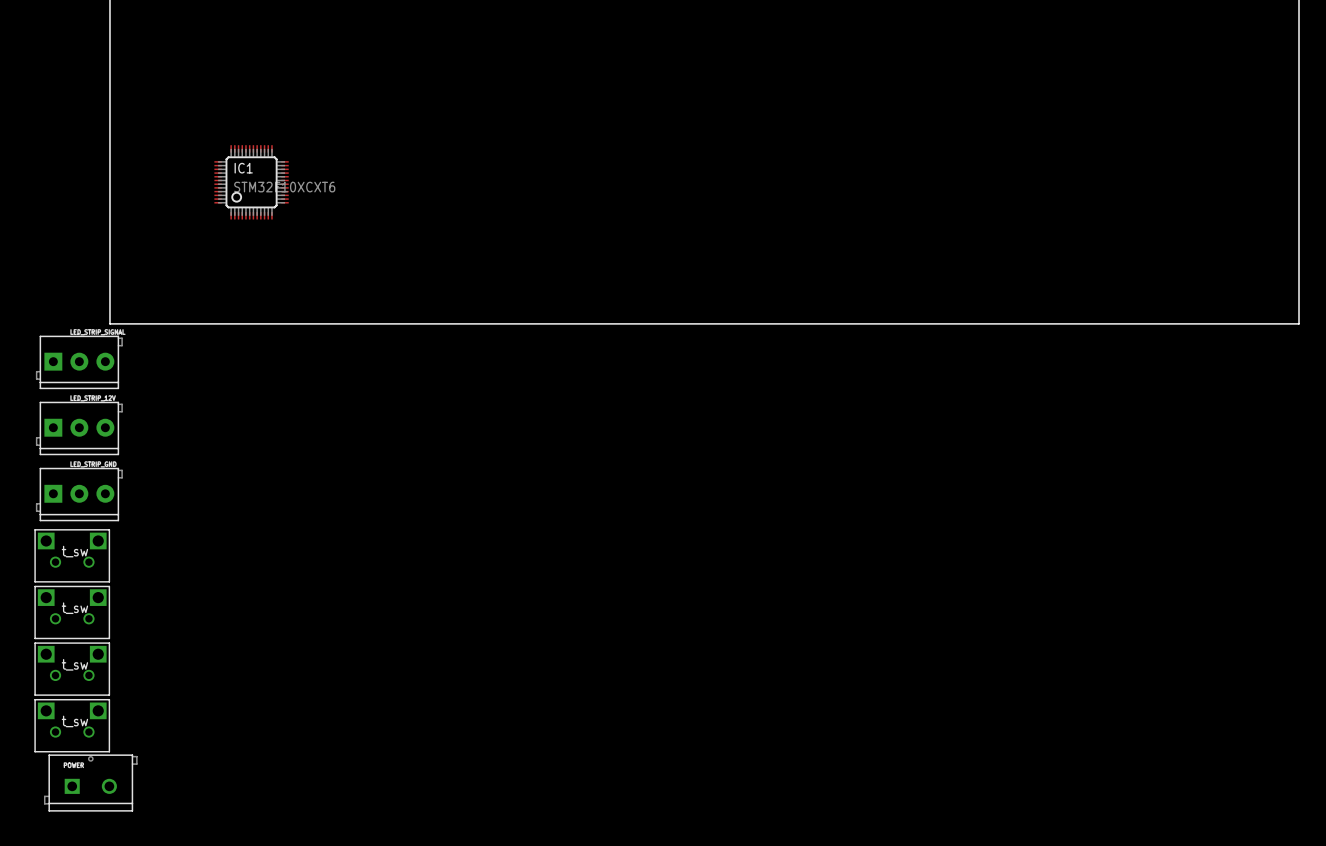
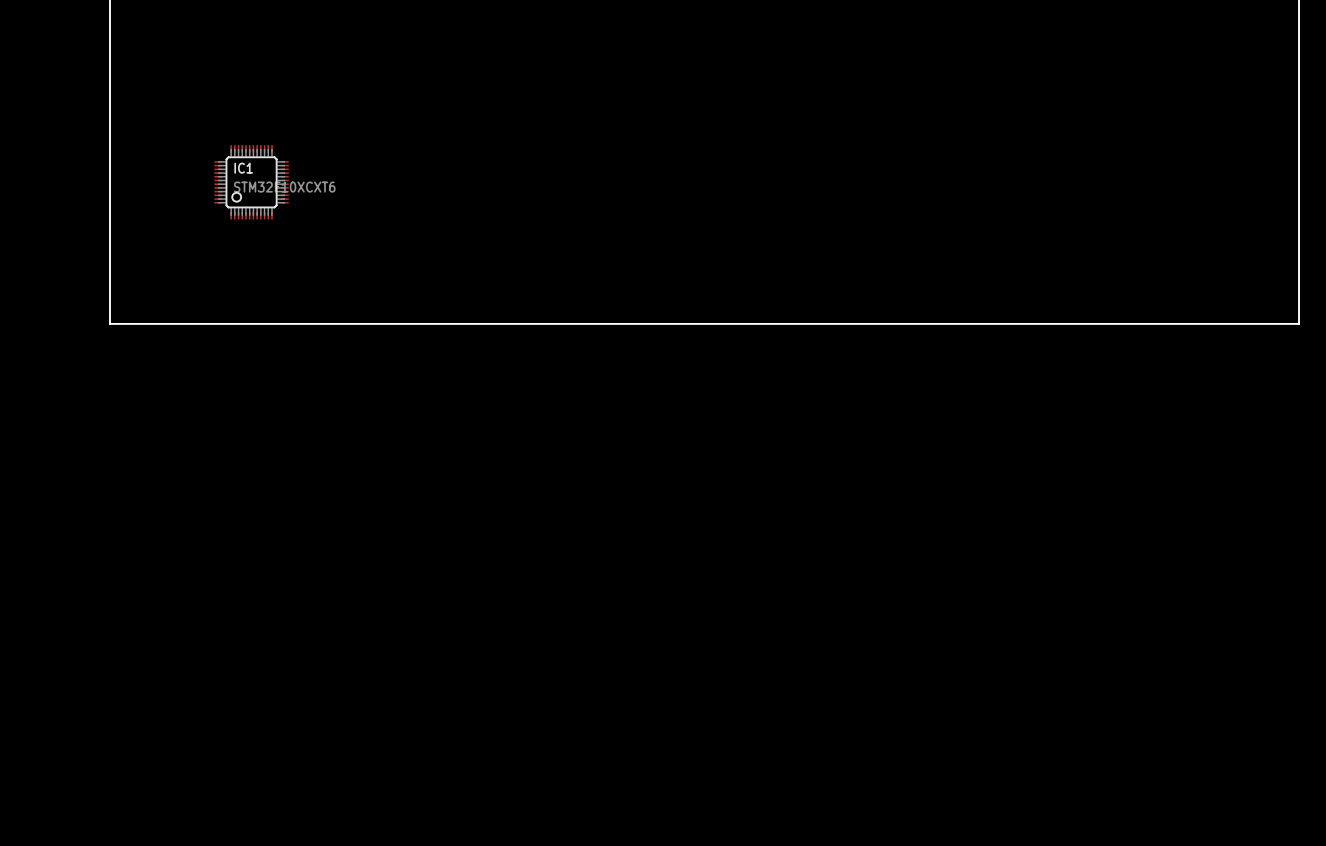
part: (79, 362) -> none
part: (79, 428) -> none
part: (79, 494) -> none
part: (72, 555) -> none
part: (72, 612) -> none
part: (72, 669) -> none
part: (72, 725) -> none
part: (90, 783) -> none

